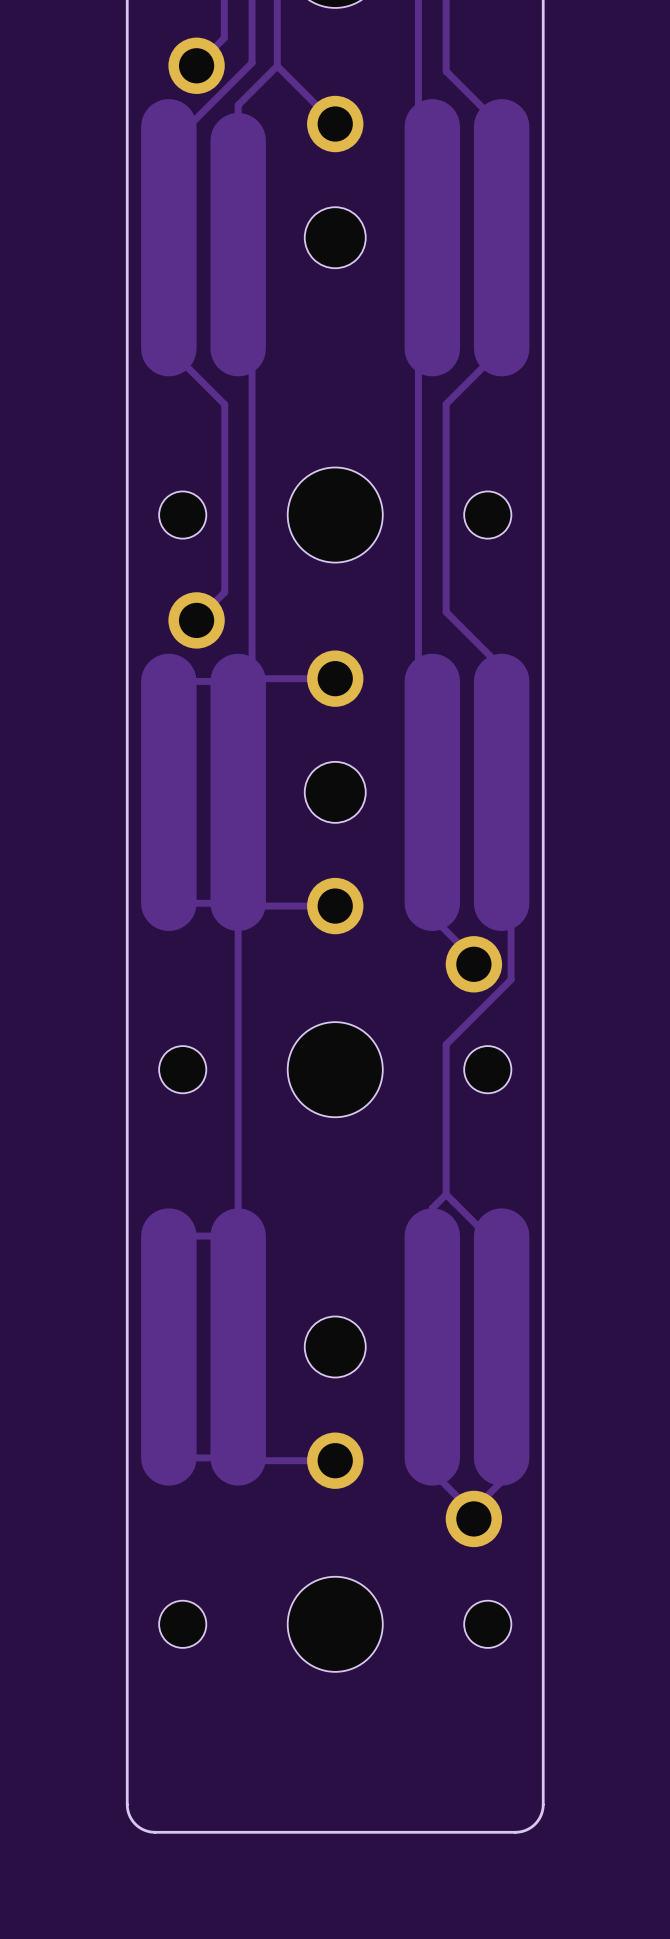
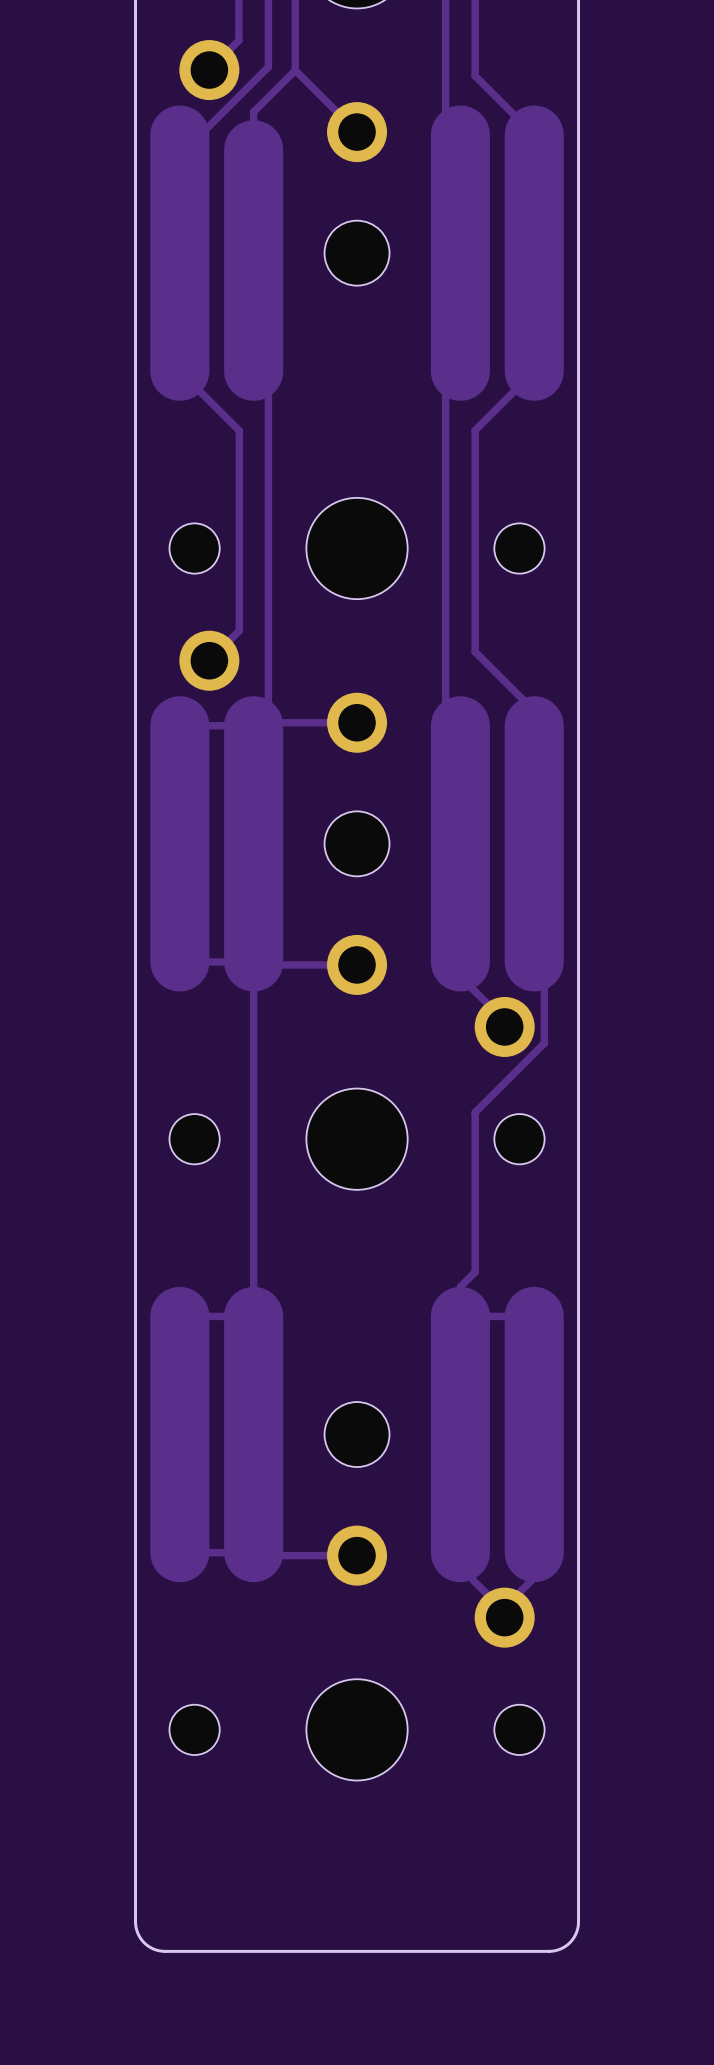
track: (446, 1194) (487, 1236) -> (460, 1316) (519, 1316)

